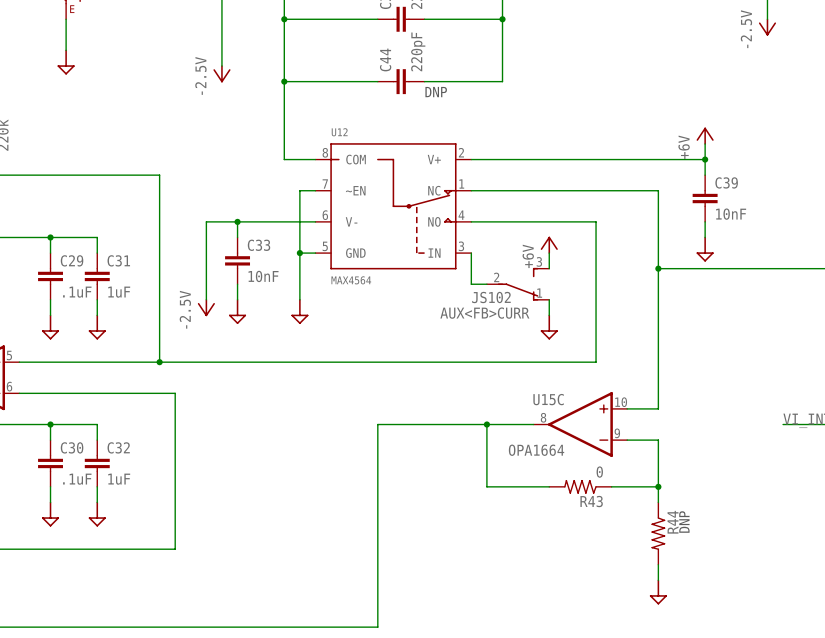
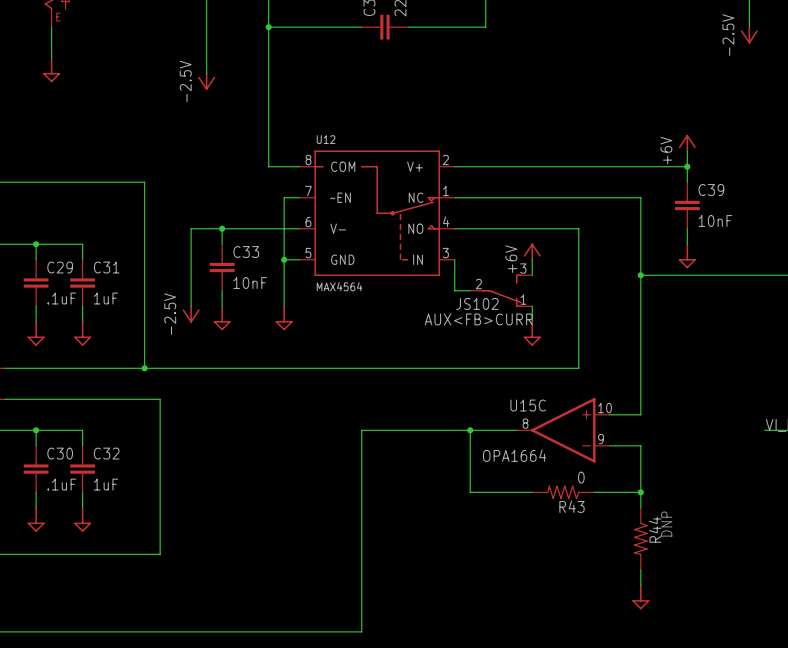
wire: (502, 19) (502, 81) (424, 81) -> none
junction: (502, 19) -> none
wire: (284, 81) (377, 81) -> none
junction: (284, 81) -> none
C44: 220pF (401, 81) -> none
text: DNP (436, 92) -> none

